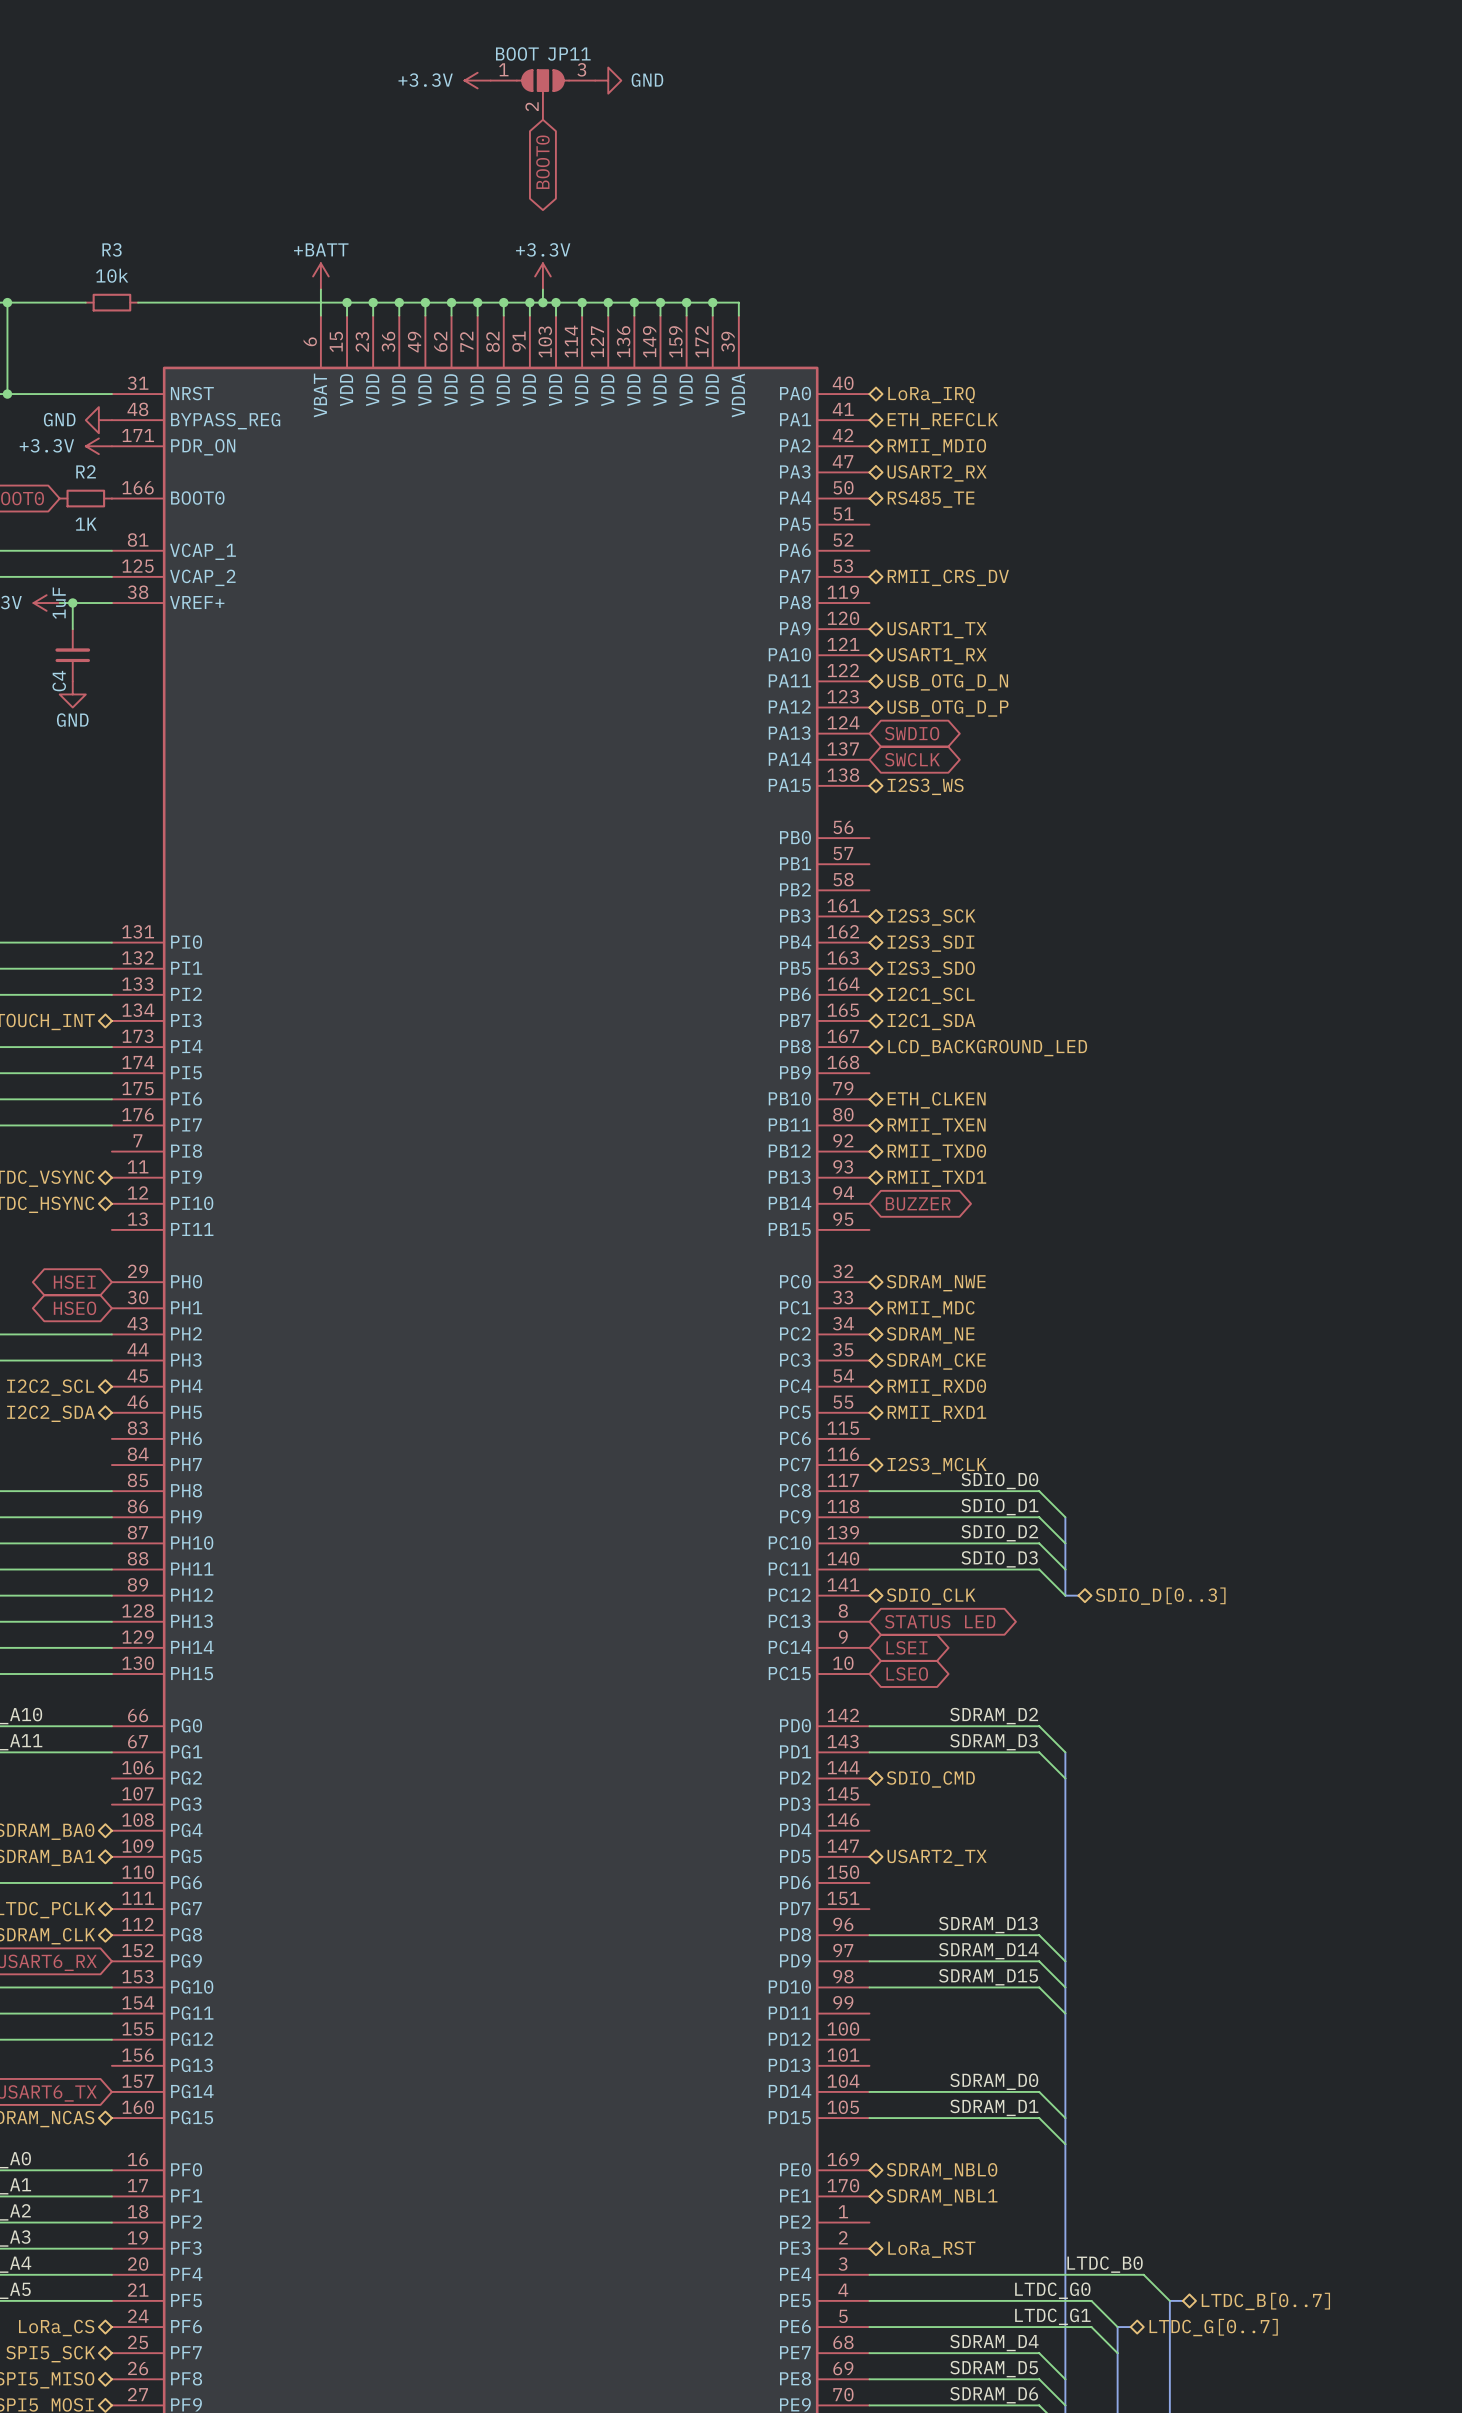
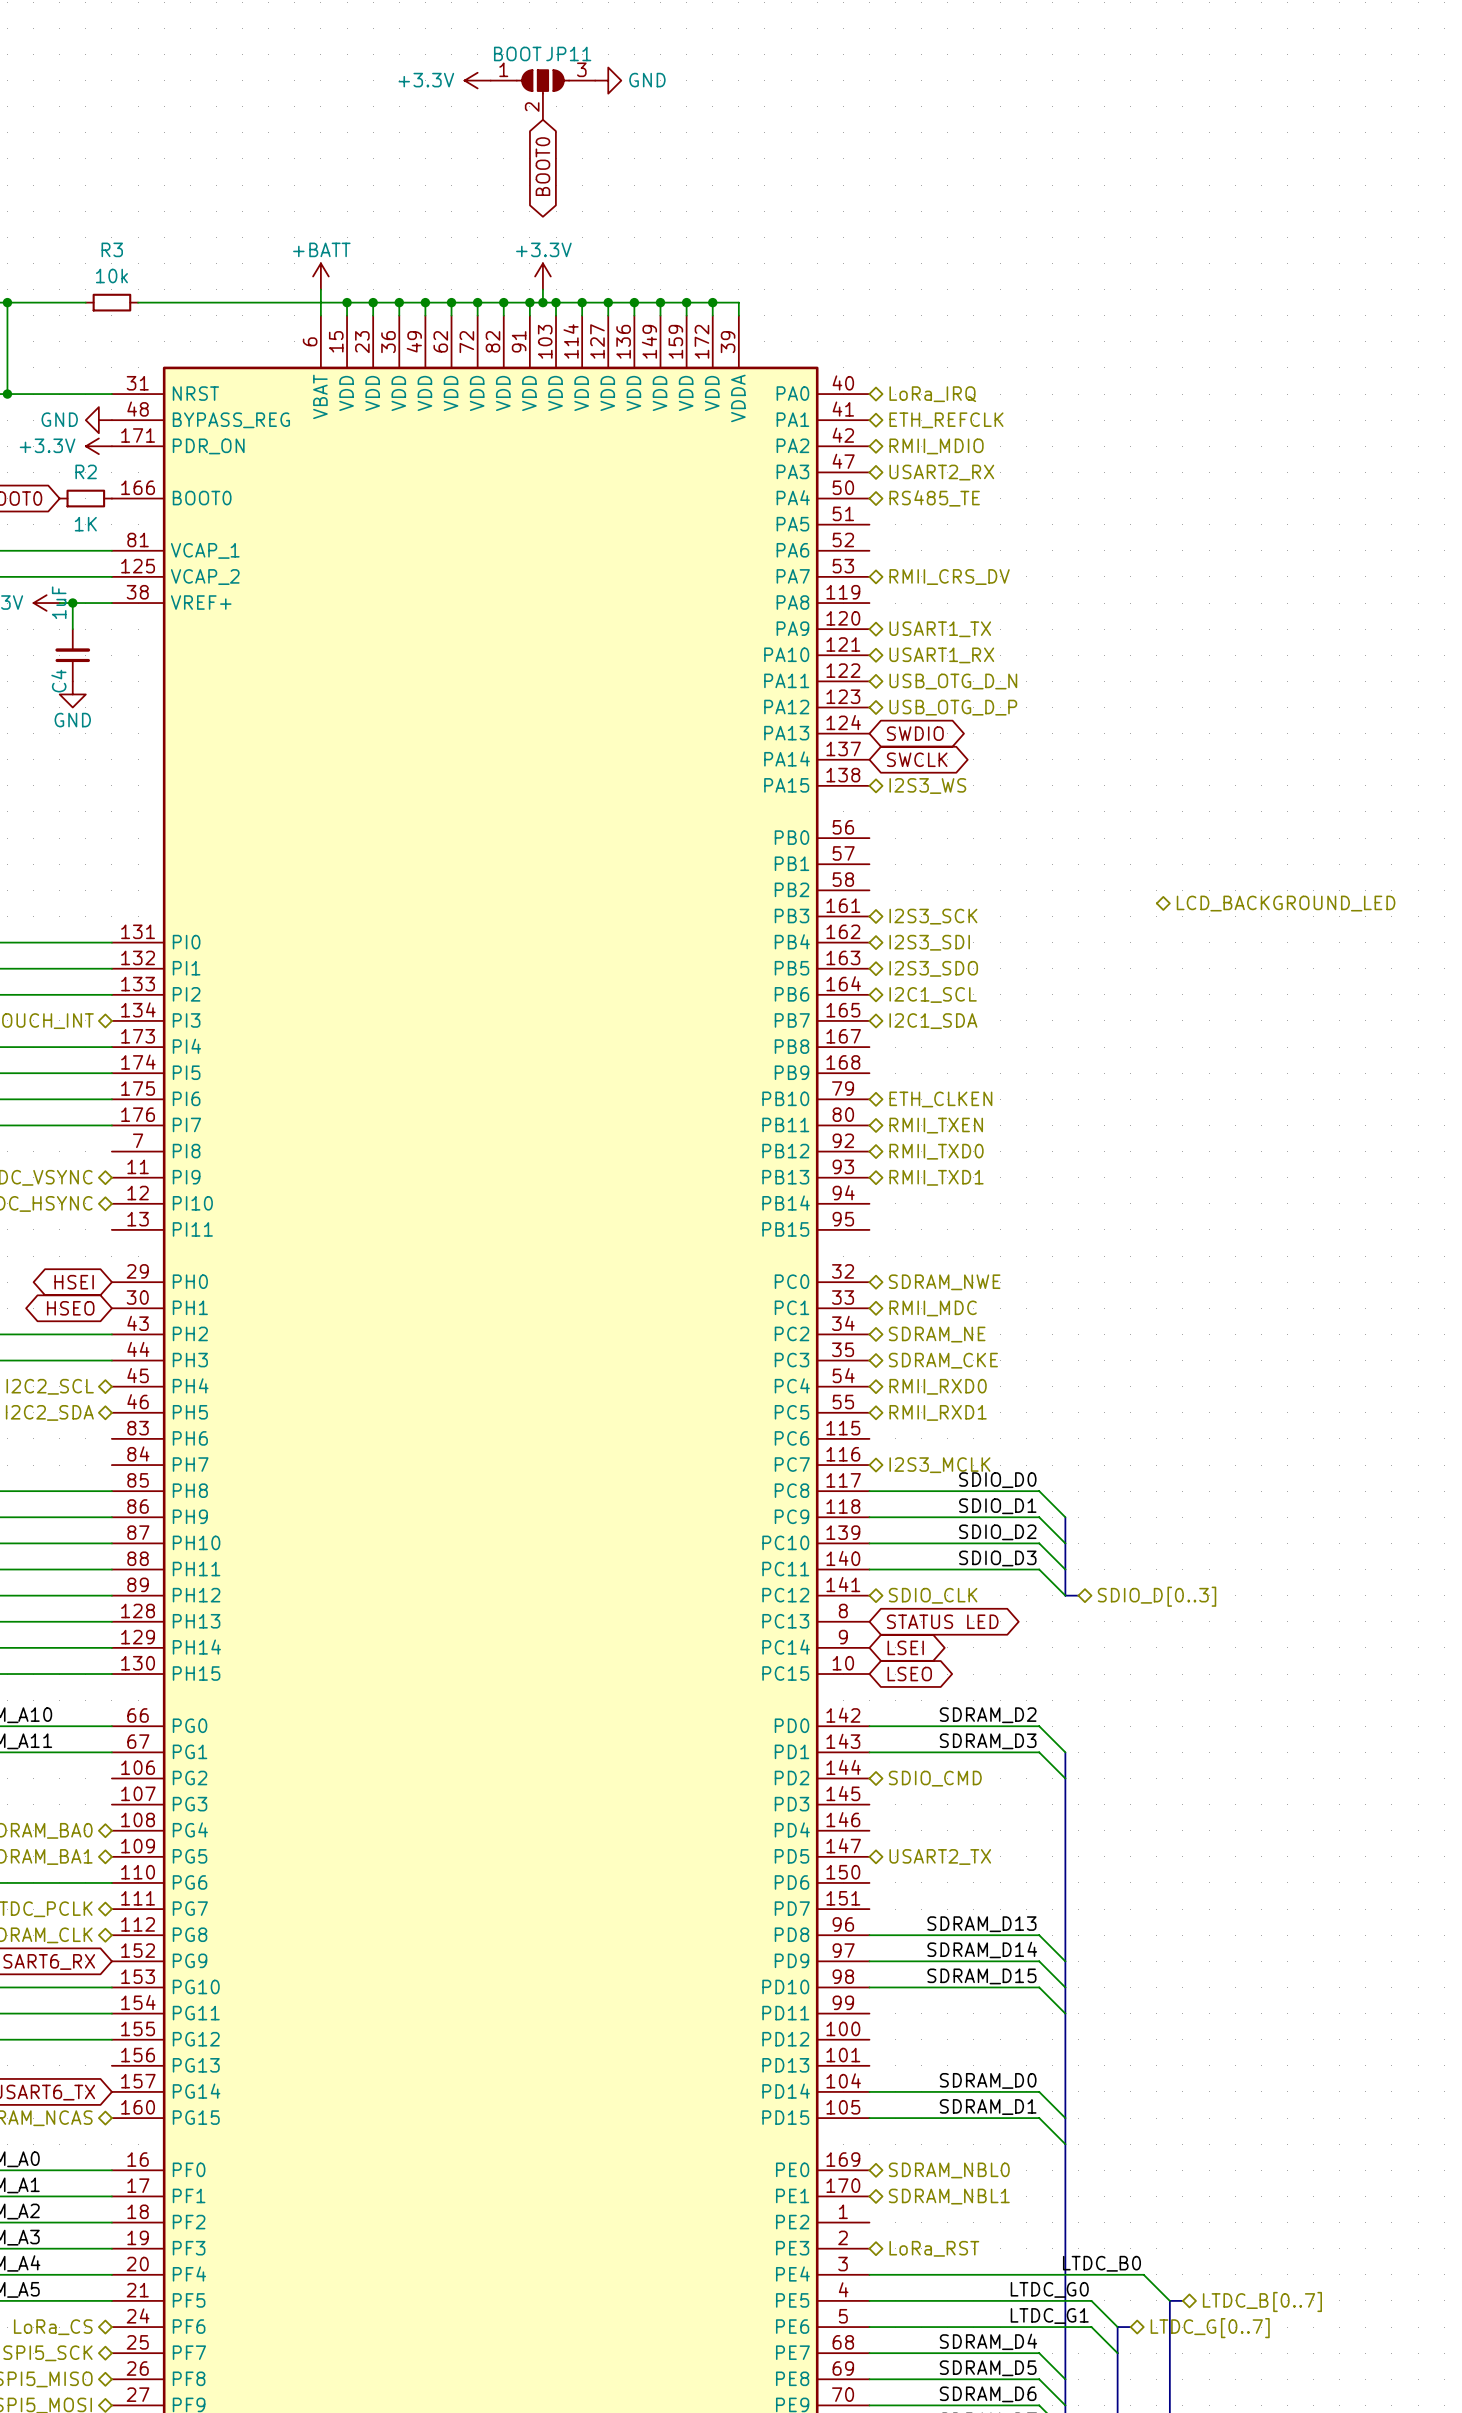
hierarchical label: none -> LCD_BACKGROUND_LED (1286, 903)
hierarchical label: LCD_BACKGROUND_LED (987, 1048) -> none
global label: BUZZER (918, 1203) -> none

